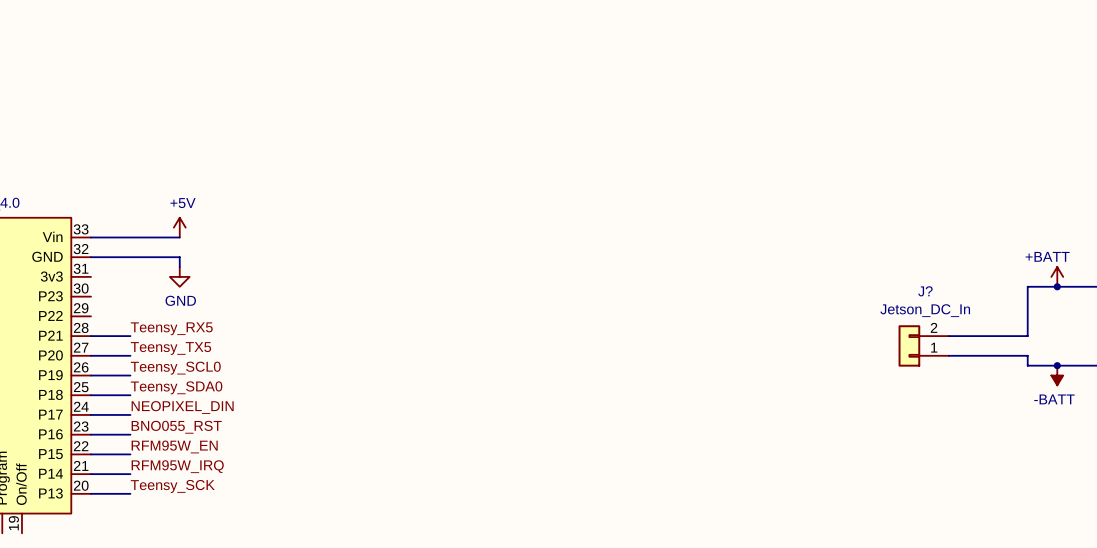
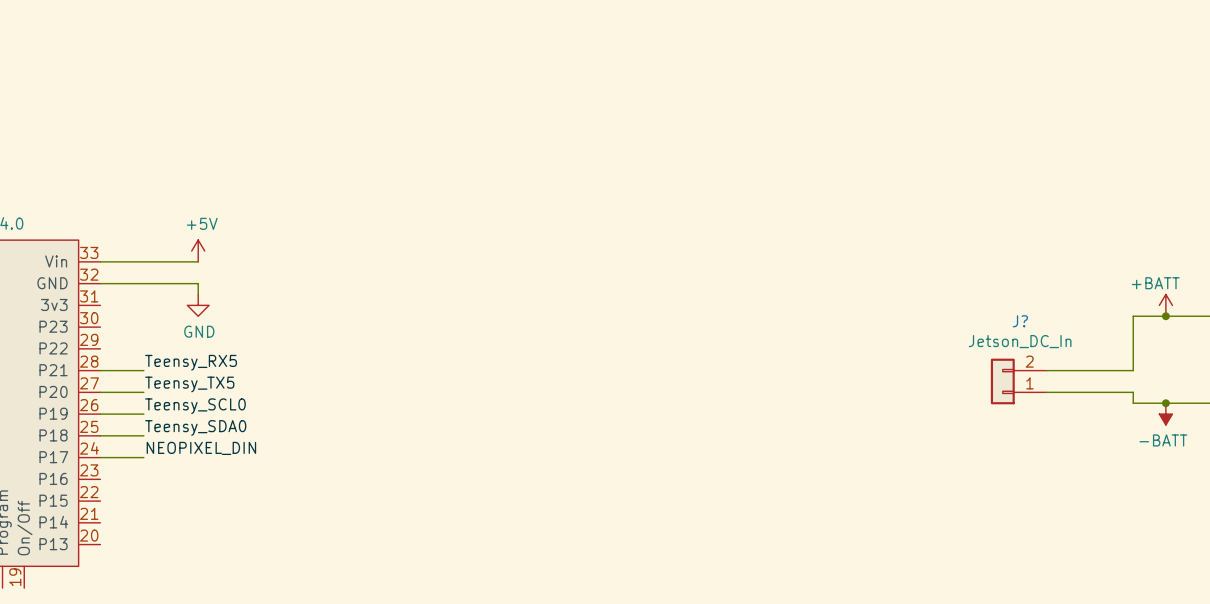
label: BNO055_RST (176, 427) -> none
wire: (91, 434) (130, 434) -> none
label: RFM95W_EN (174, 446) -> none
wire: (91, 454) (130, 454) -> none
label: RFM95W_IRQ (177, 466) -> none
wire: (91, 474) (130, 474) -> none
label: Teensy_SCK (172, 486) -> none
wire: (91, 493) (130, 493) -> none

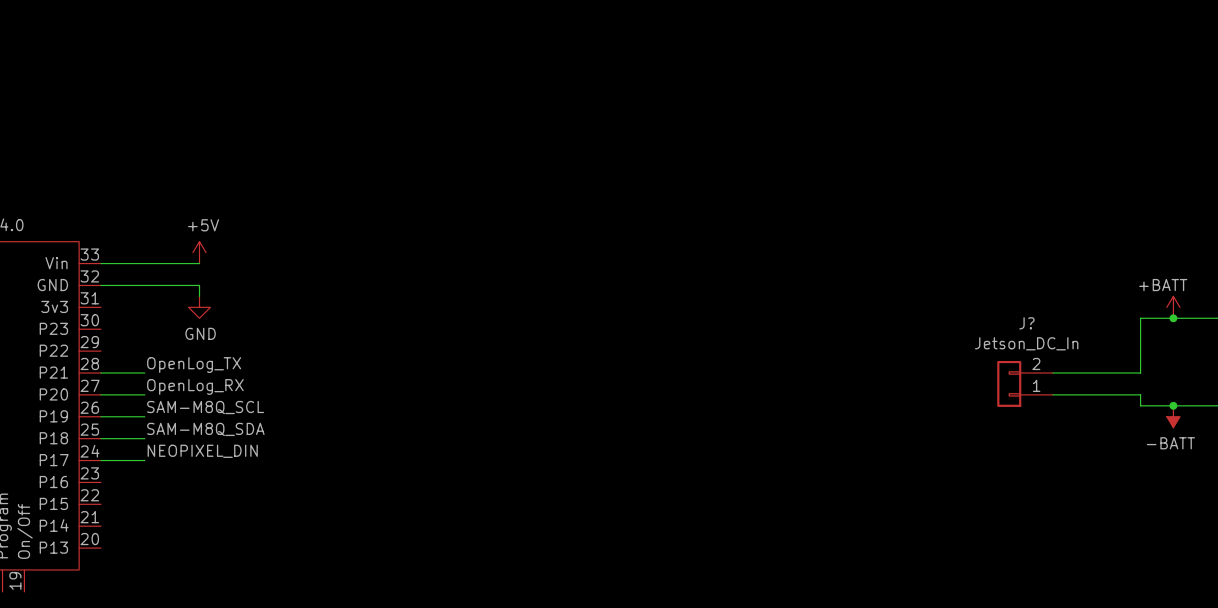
label: Teensy_RX5 (191, 362) -> OpenLog_TX (194, 365)
label: Teensy_TX5 (189, 384) -> OpenLog_RX (195, 386)
label: Teensy_SCL0 (195, 406) -> SAM-M8Q_SCL (205, 407)
label: Teensy_SDA0 (195, 427) -> SAM-M8Q_SDA (205, 429)

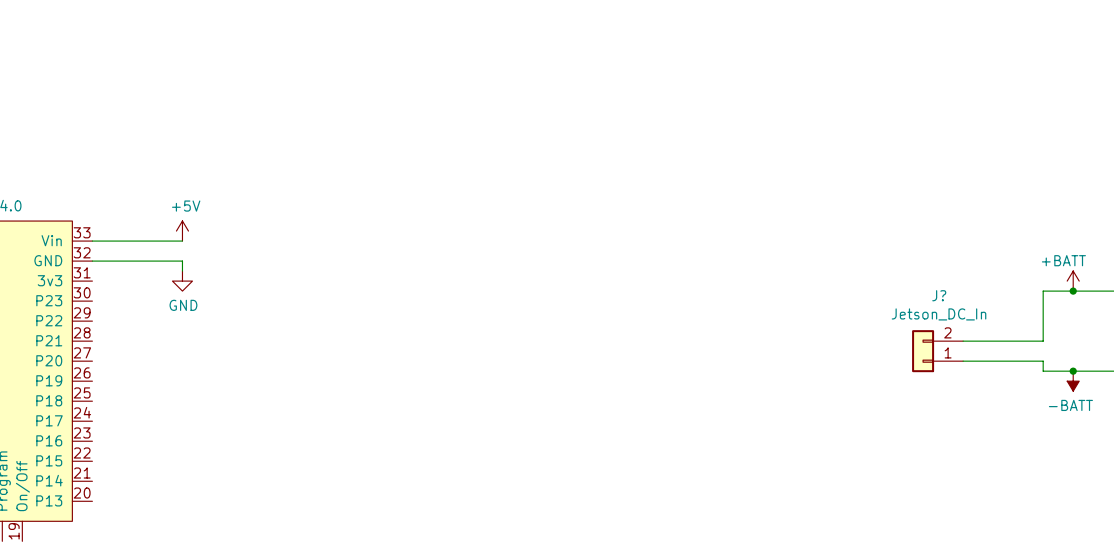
label: OpenLog_TX (194, 365) -> none
wire: (101, 372) (144, 372) -> none
label: OpenLog_RX (195, 386) -> none
wire: (101, 394) (144, 394) -> none
label: SAM-M8Q_SCL (205, 407) -> none
wire: (101, 416) (144, 416) -> none
label: SAM-M8Q_SDA (205, 429) -> none
wire: (101, 438) (144, 438) -> none
label: NEOPIXEL_DIN (202, 451) -> none
wire: (101, 460) (144, 460) -> none

